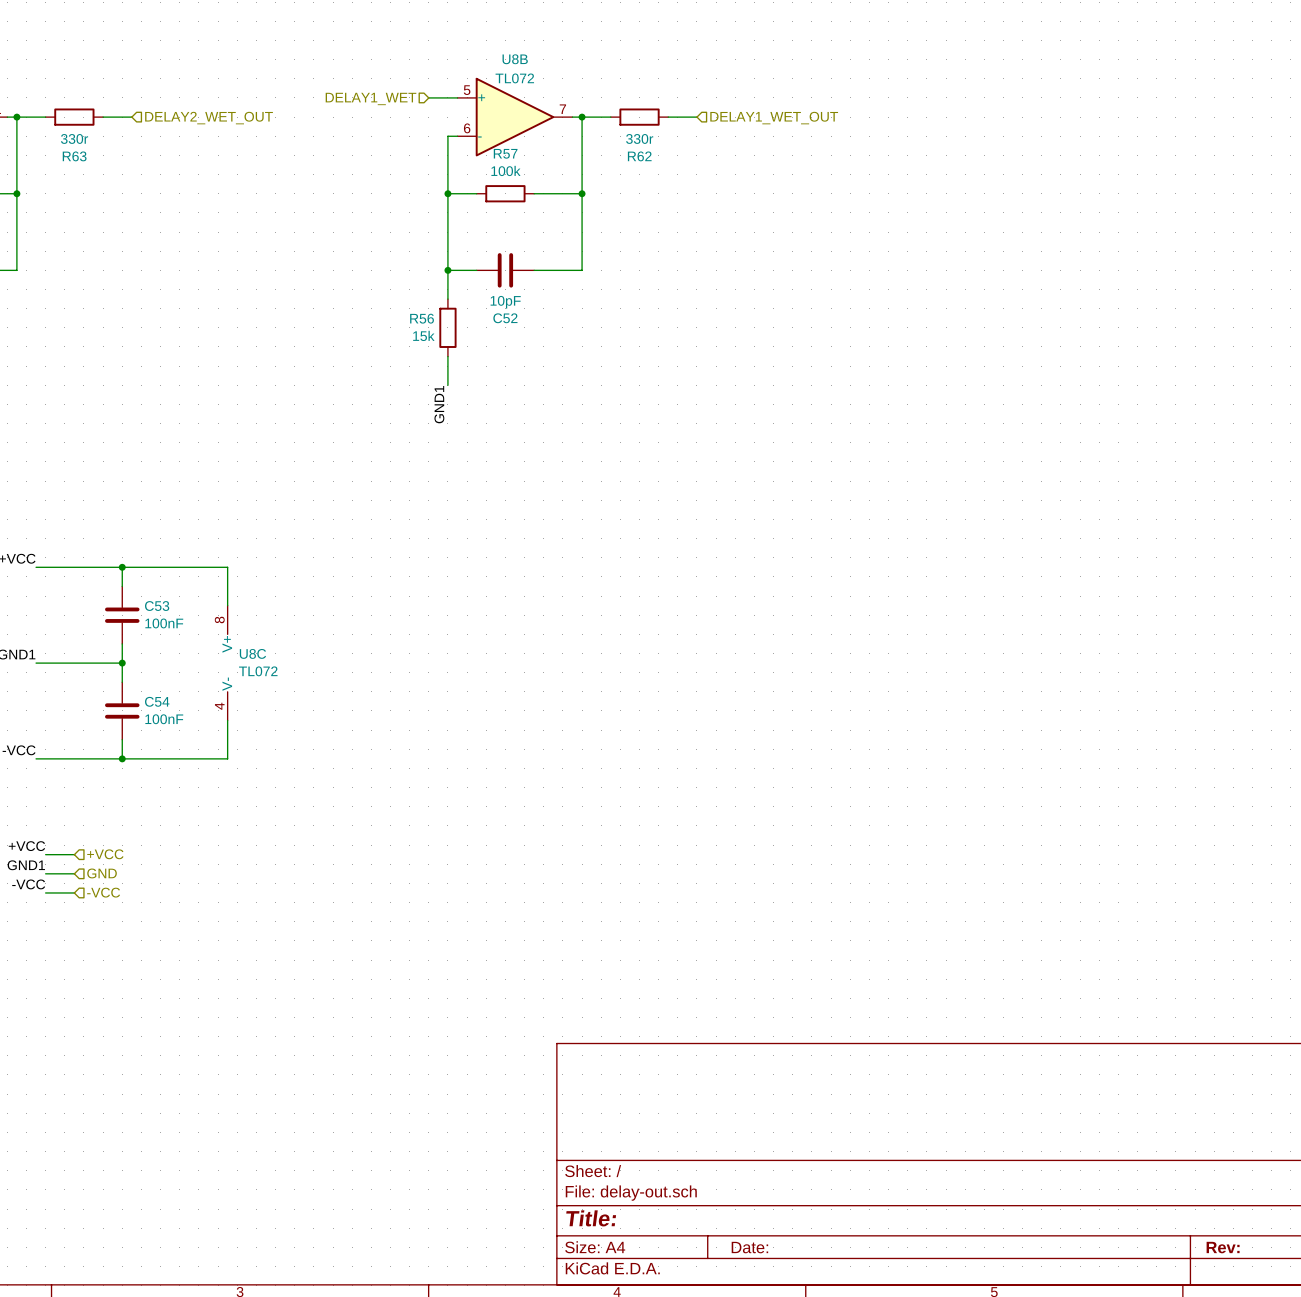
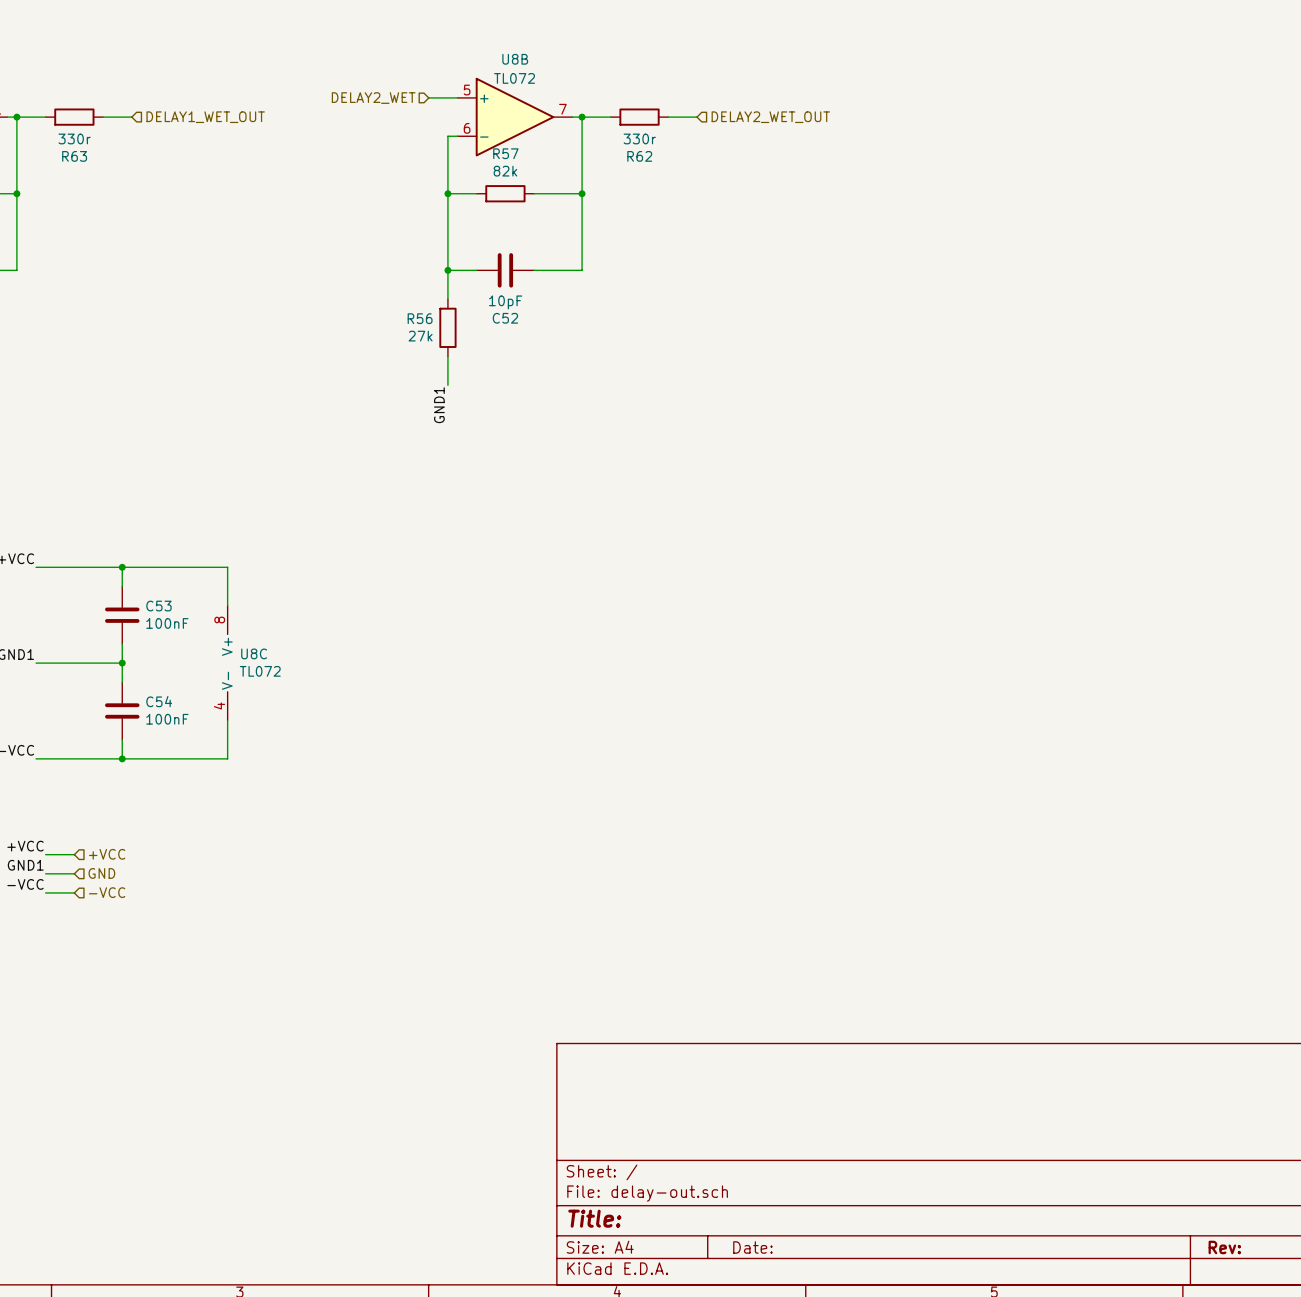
hierarchical label: DELAY1_WET (371, 98) -> DELAY2_WET (373, 98)
hierarchical label: DELAY2_WET_OUT (209, 118) -> DELAY1_WET_OUT (205, 117)
hierarchical label: DELAY1_WET_OUT (774, 118) -> DELAY2_WET_OUT (770, 117)
R57 value: 100k (505, 170) -> 82k (505, 171)
R56 value: 15k (423, 335) -> 27k (420, 336)

